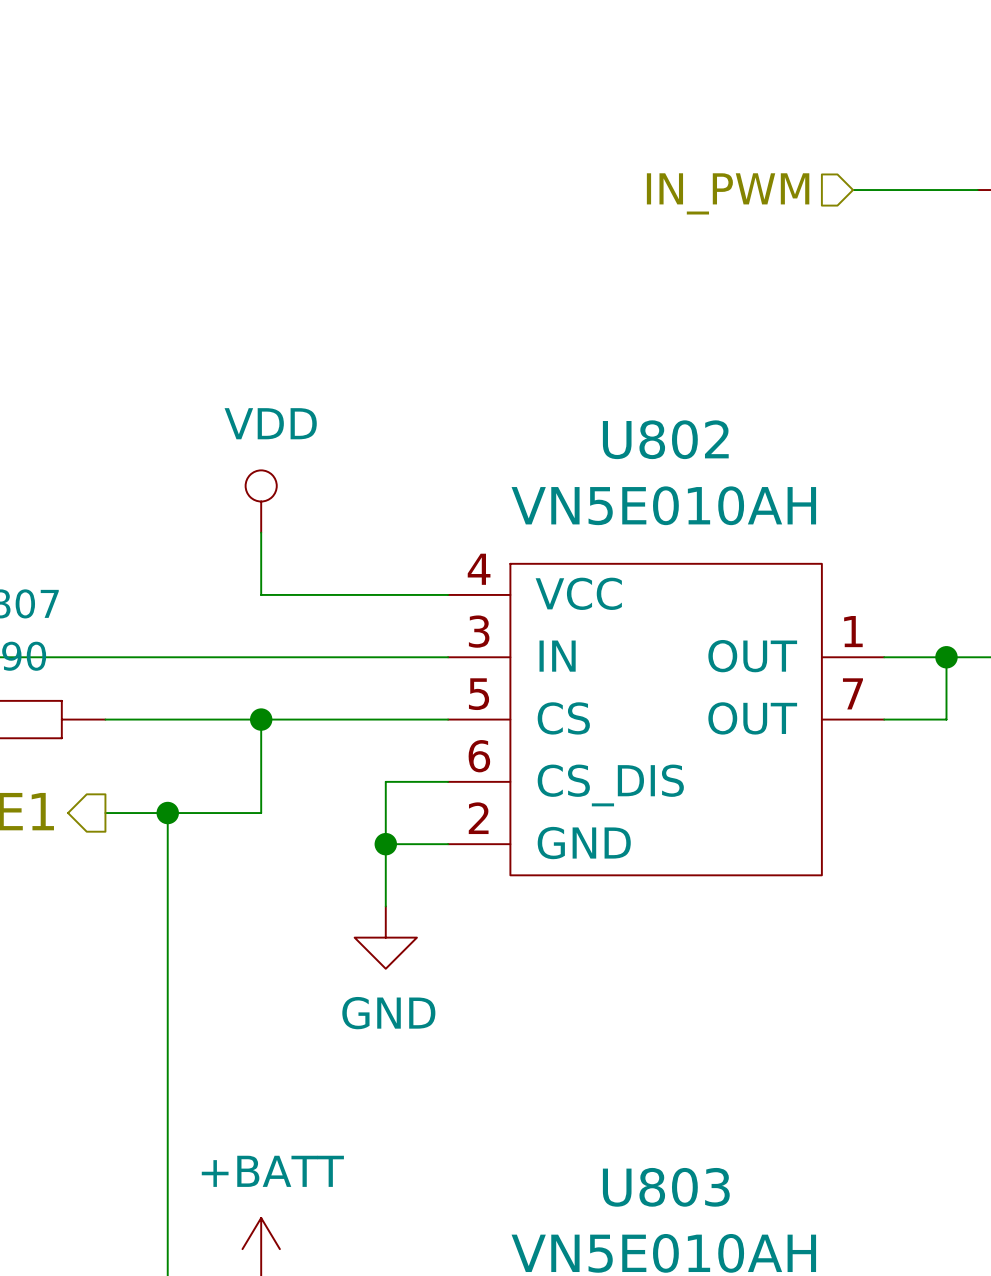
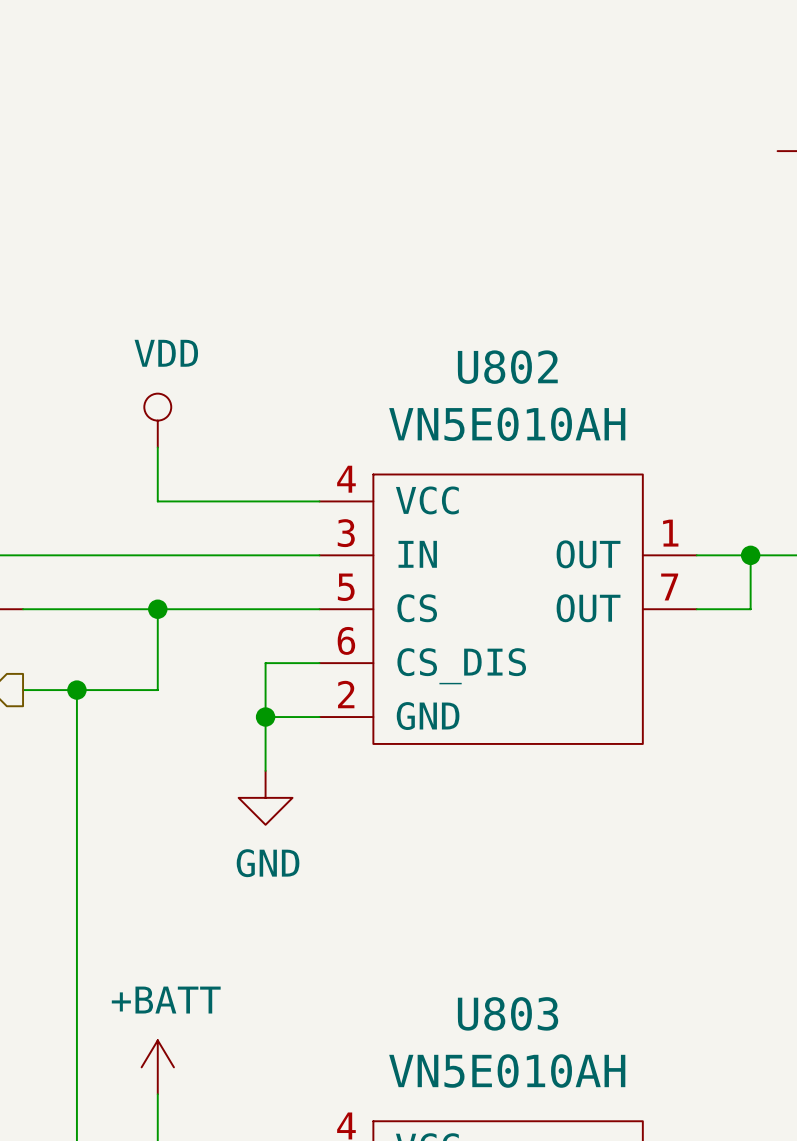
wire: (853, 190) (977, 190) -> none
hierarchical label: IN_PWM (728, 193) -> none

